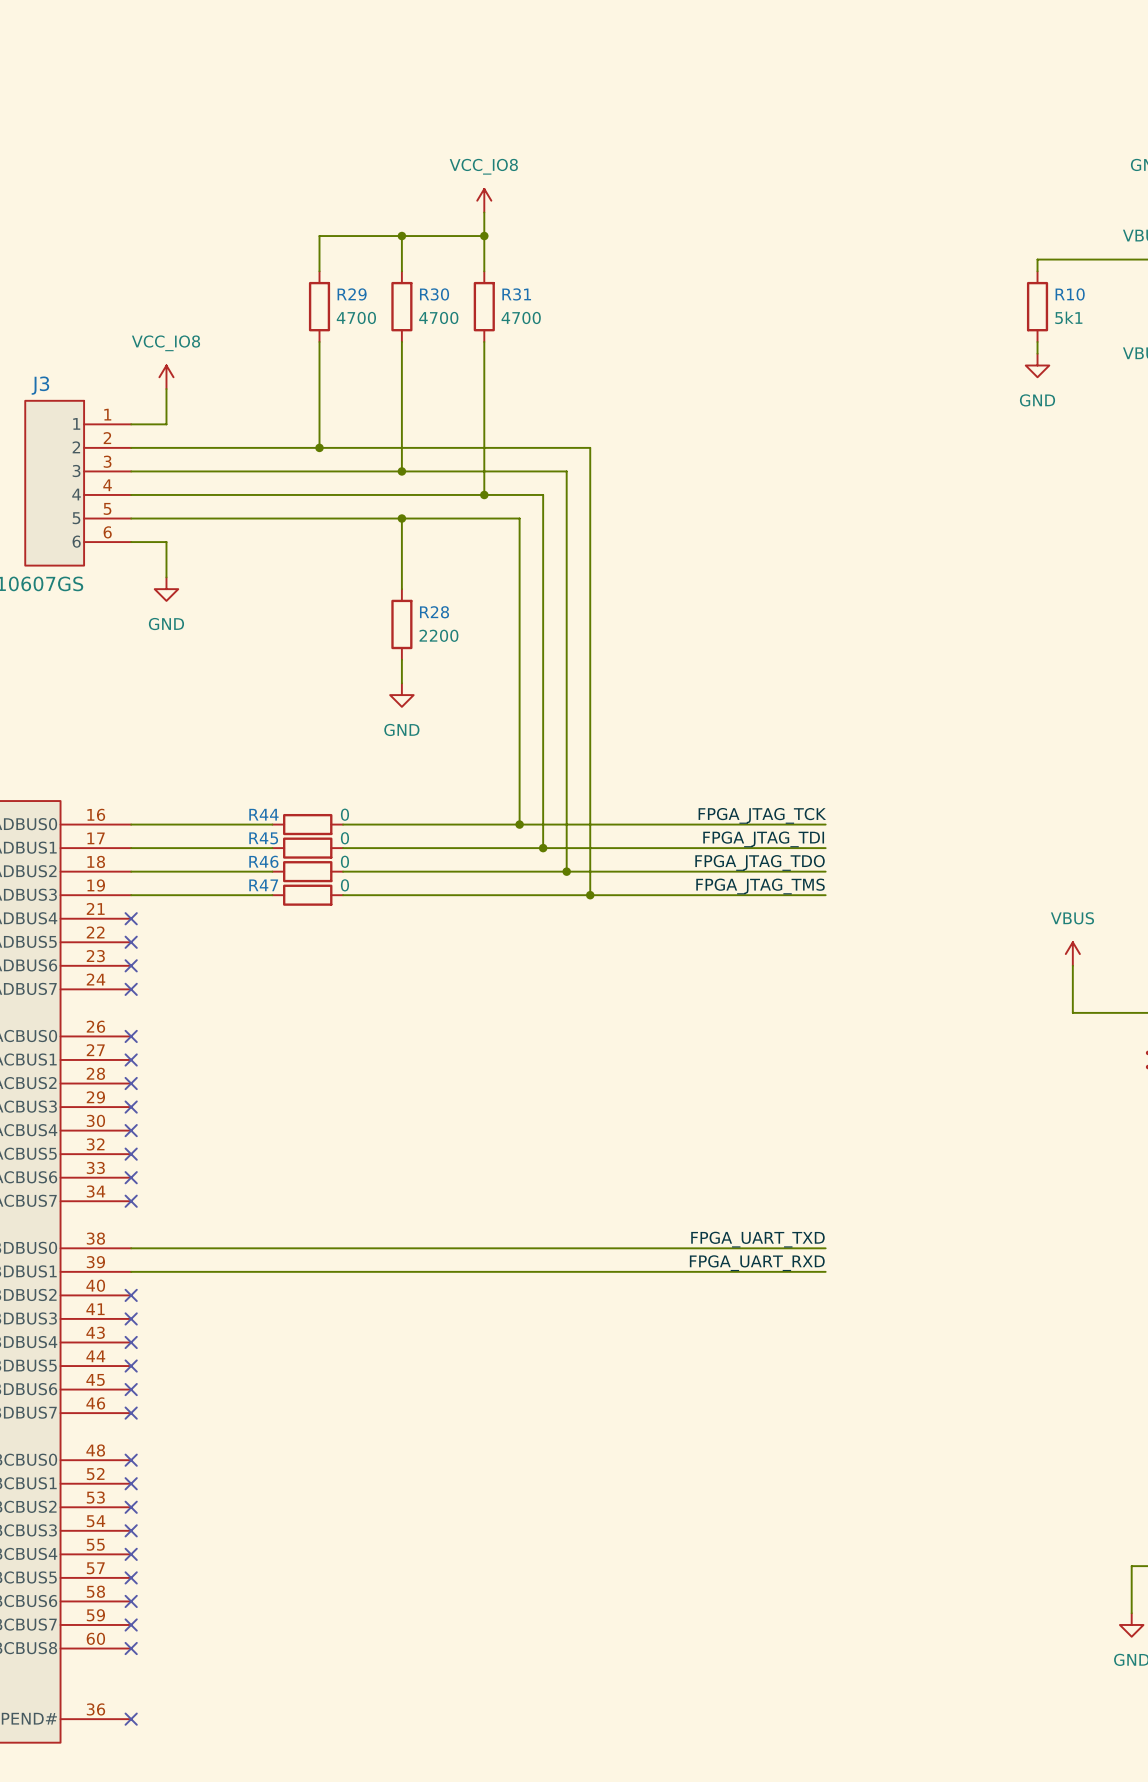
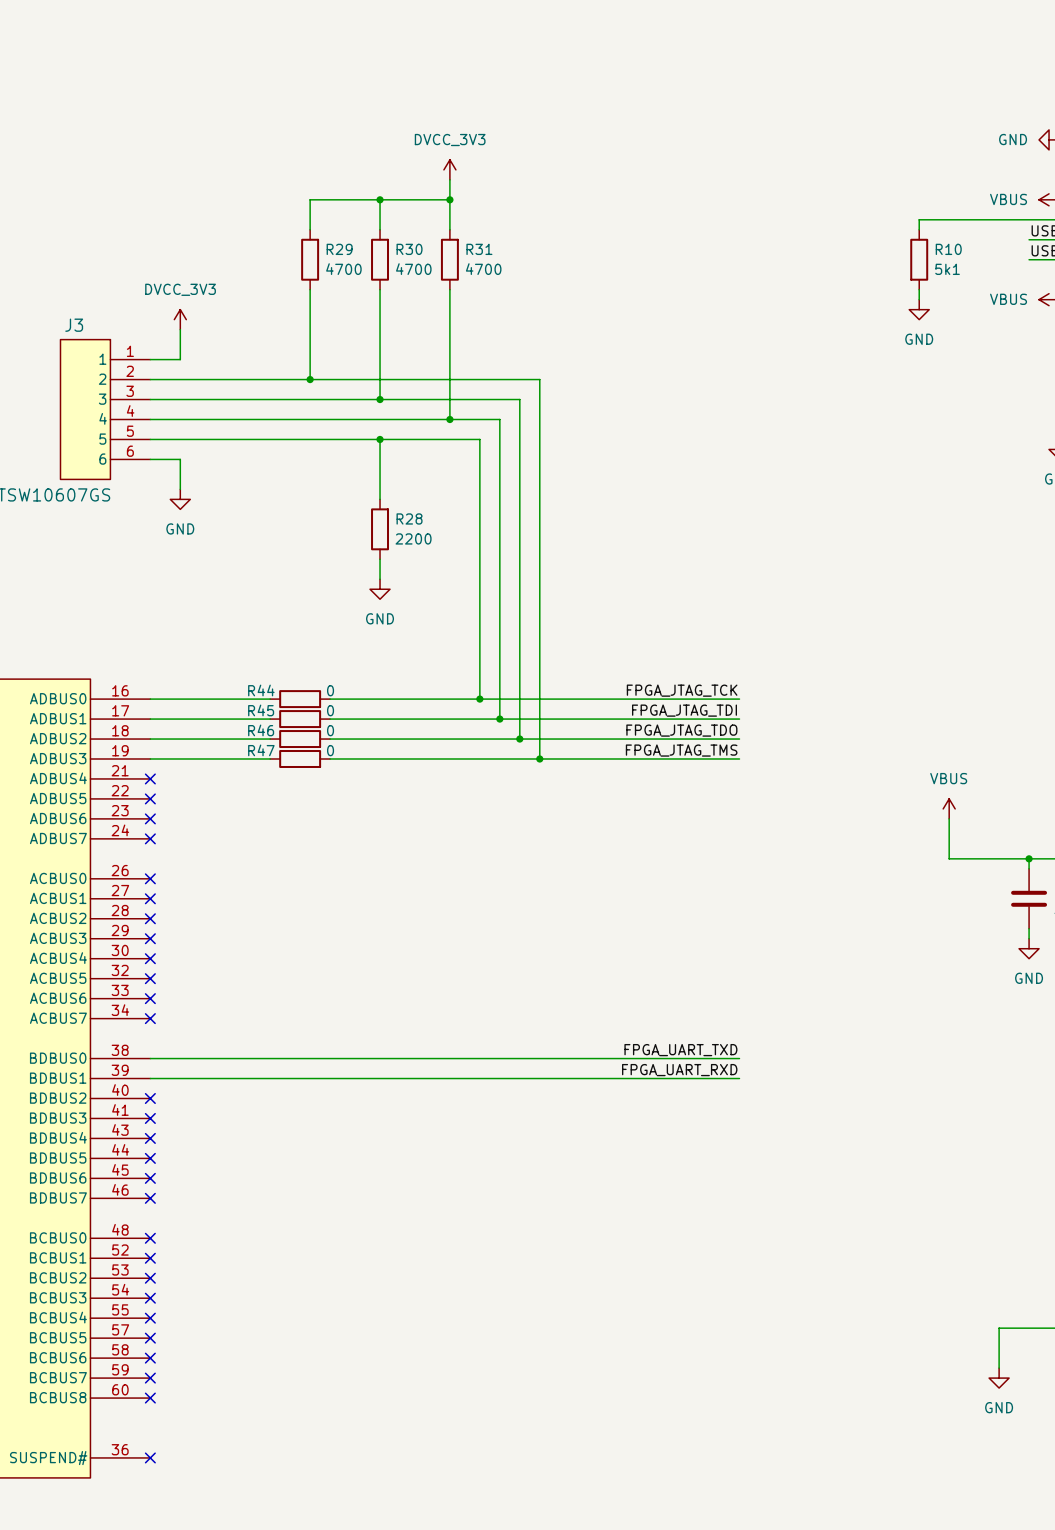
power symbol: VCC_IO8 (484, 200) -> DVCC_3V3 (449, 169)
power symbol: VCC_IO8 (166, 377) -> DVCC_3V3 (180, 319)

